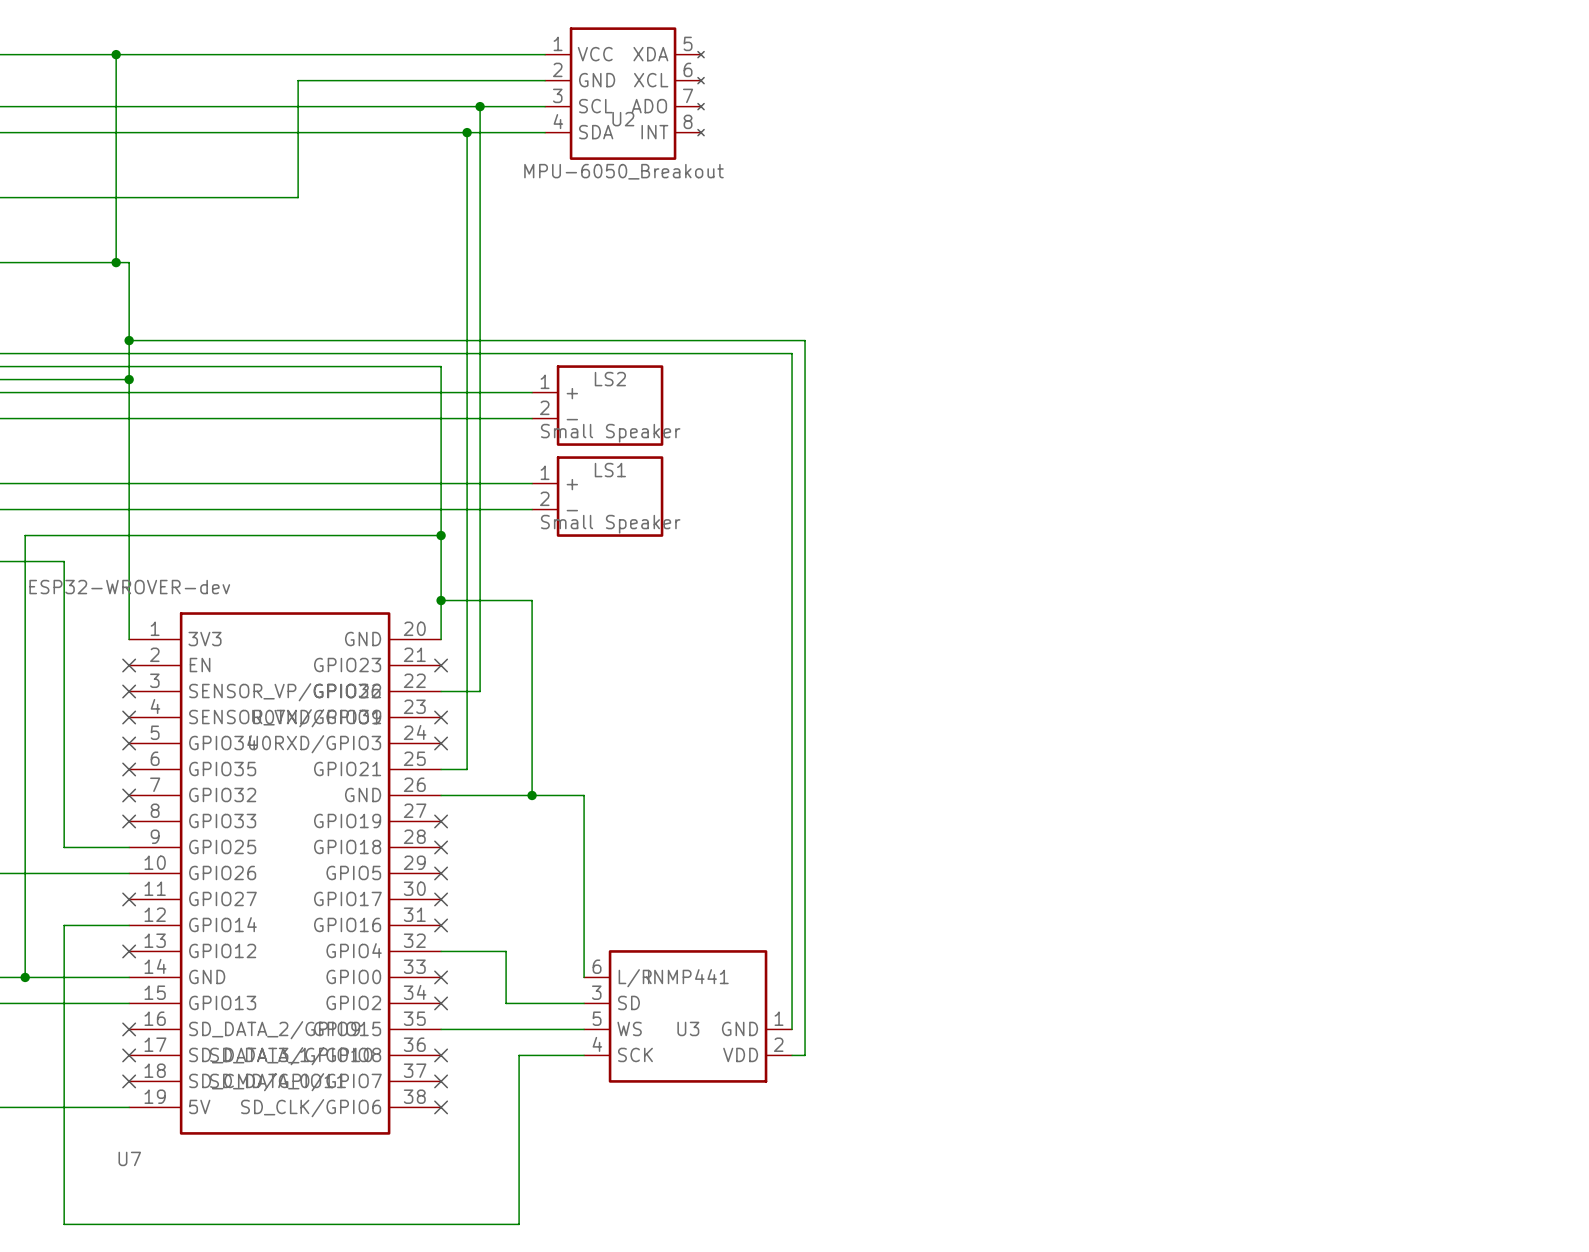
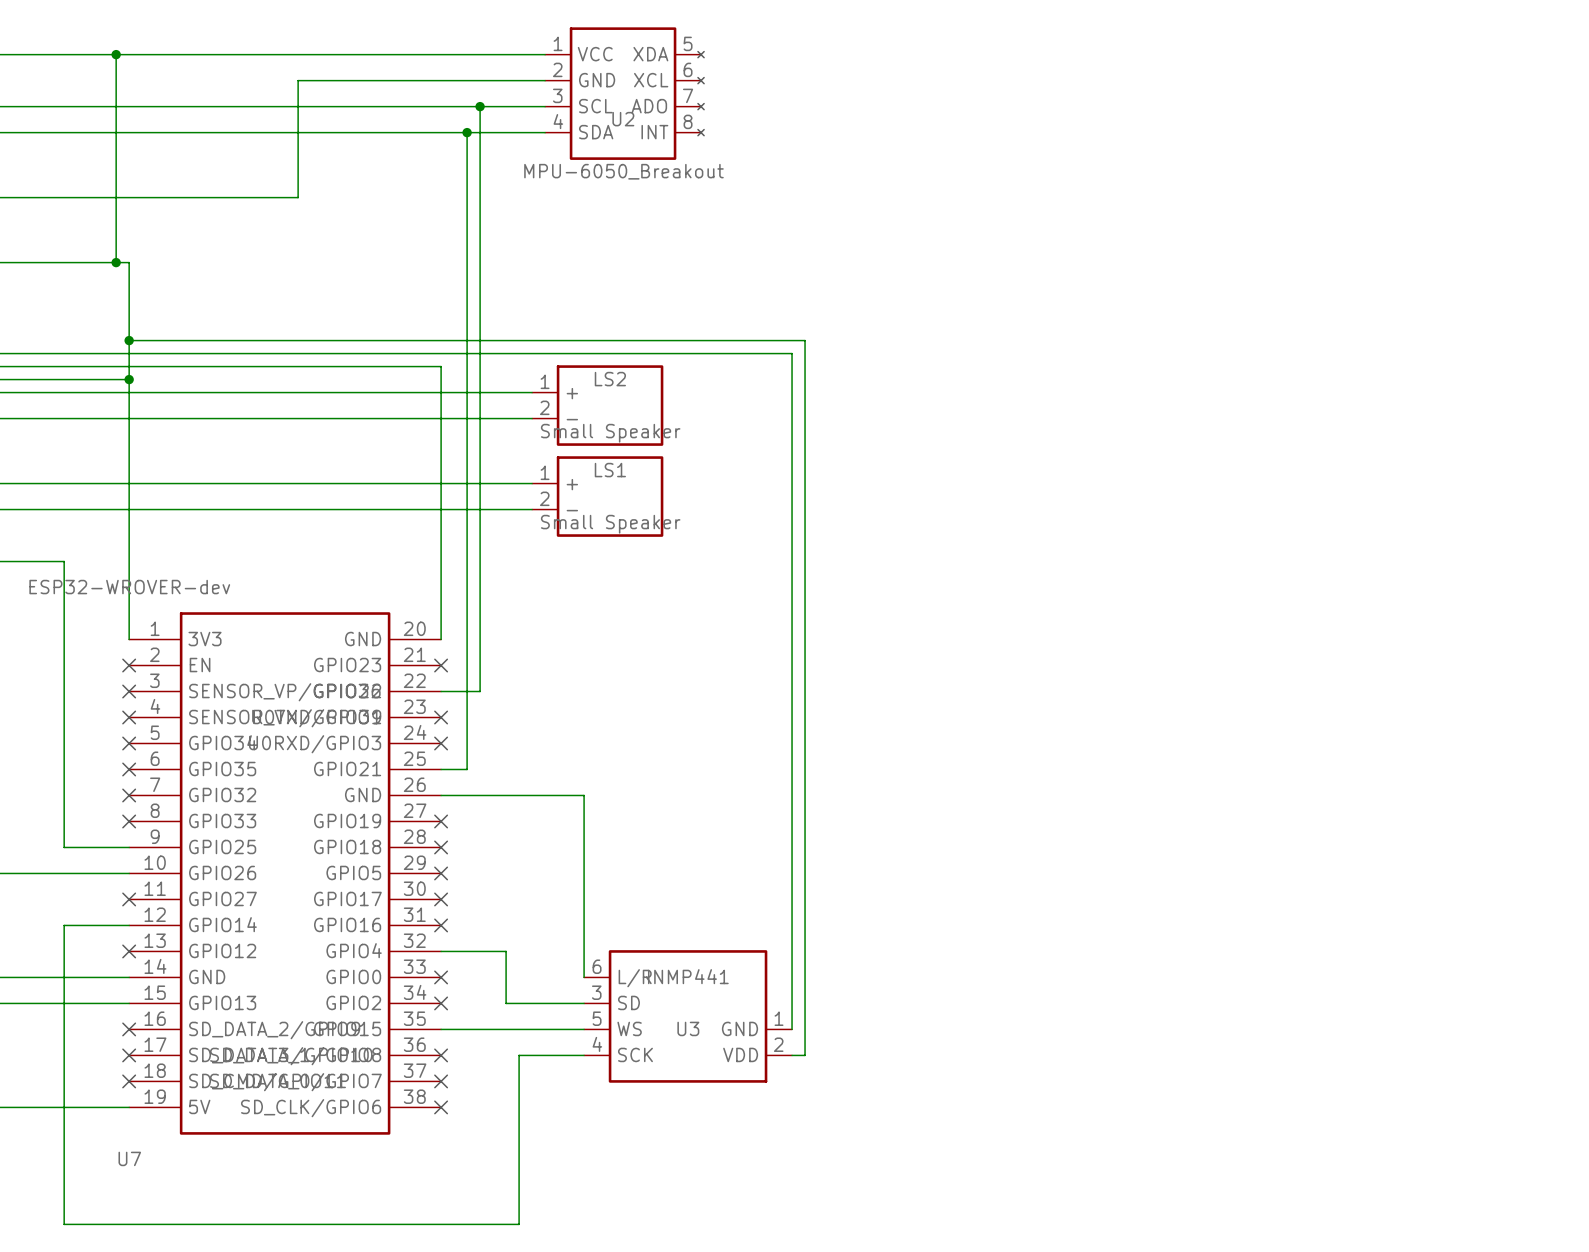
wire: (441, 535) (25, 535) (25, 977) -> none
junction: (441, 535) -> none
wire: (441, 600) (532, 600) (532, 795) -> none
junction: (441, 600) -> none
junction: (532, 795) -> none
junction: (25, 977) -> none

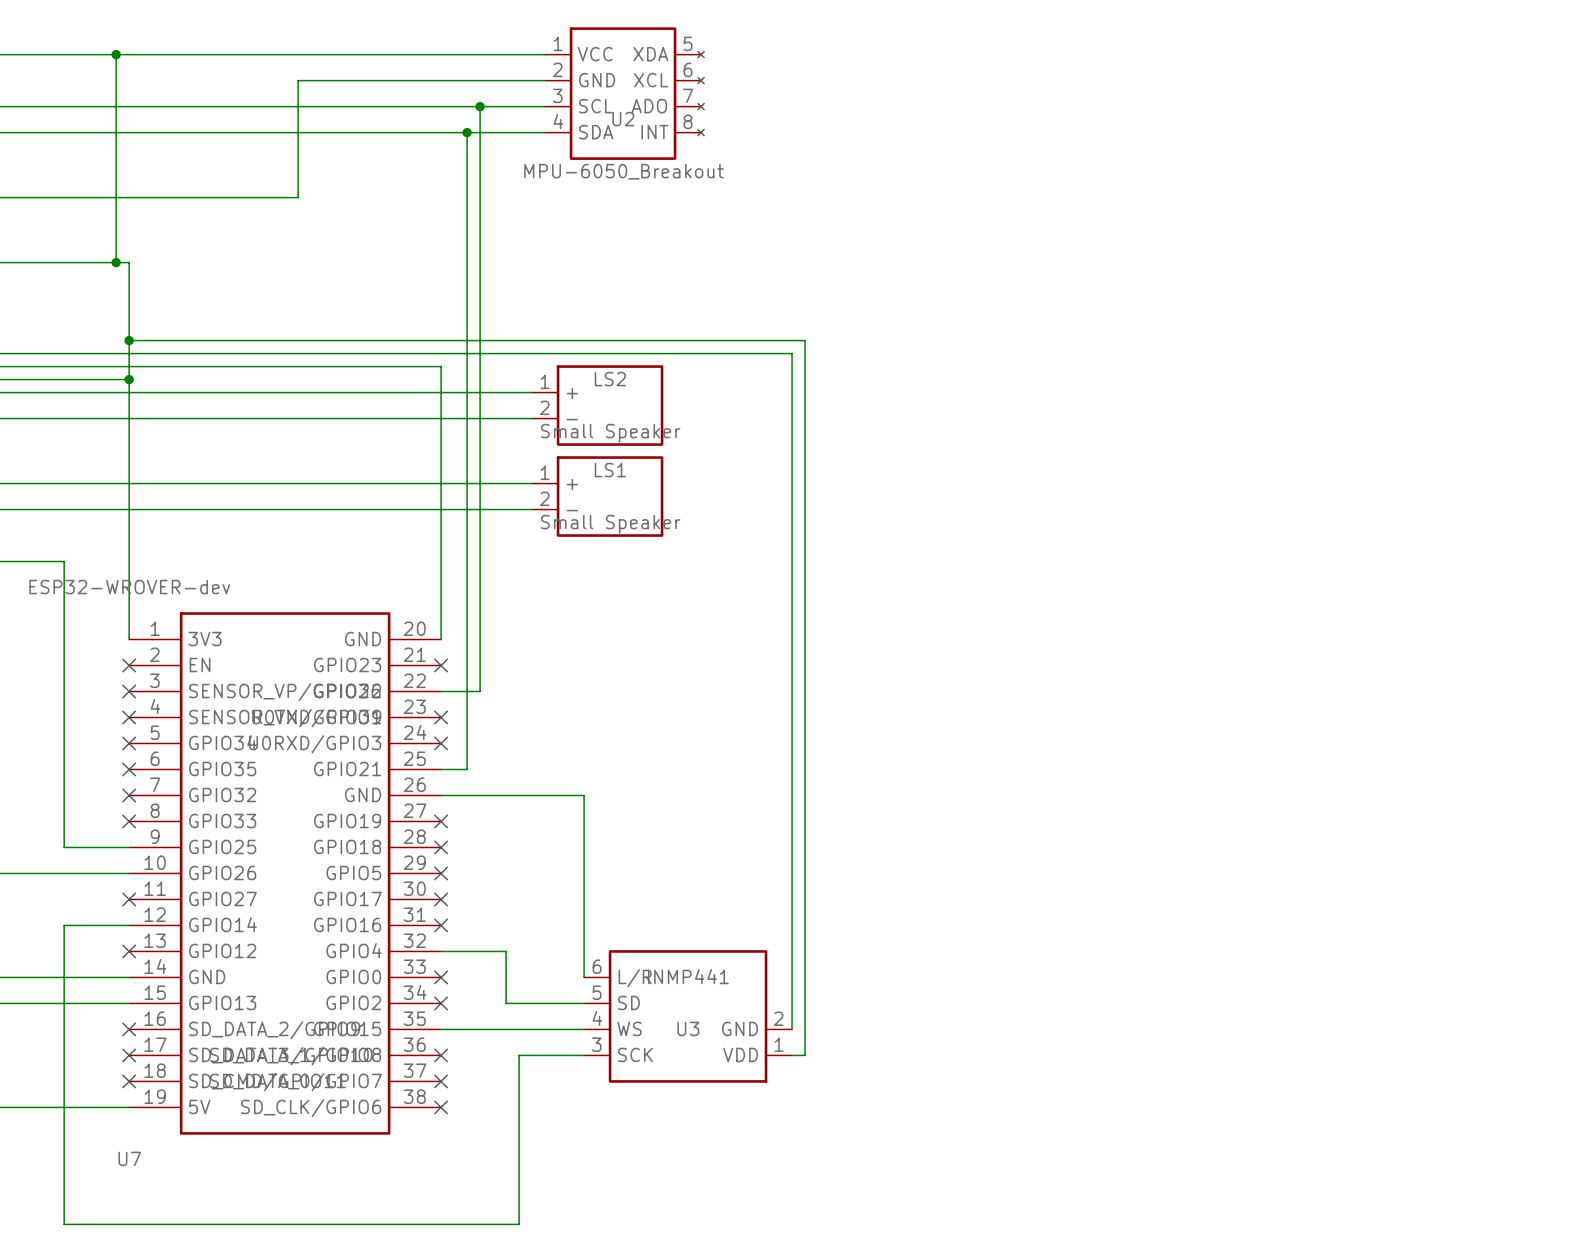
U3 pin number: 3 (596, 992) -> 5 (597, 992)
U3 pin number: 5 (597, 1018) -> 4 (597, 1018)
U3 pin number: 1 (779, 1018) -> 2 (778, 1018)
U3 pin number: 4 (597, 1044) -> 3 (596, 1044)
U3 pin number: 2 (778, 1044) -> 1 (779, 1044)

